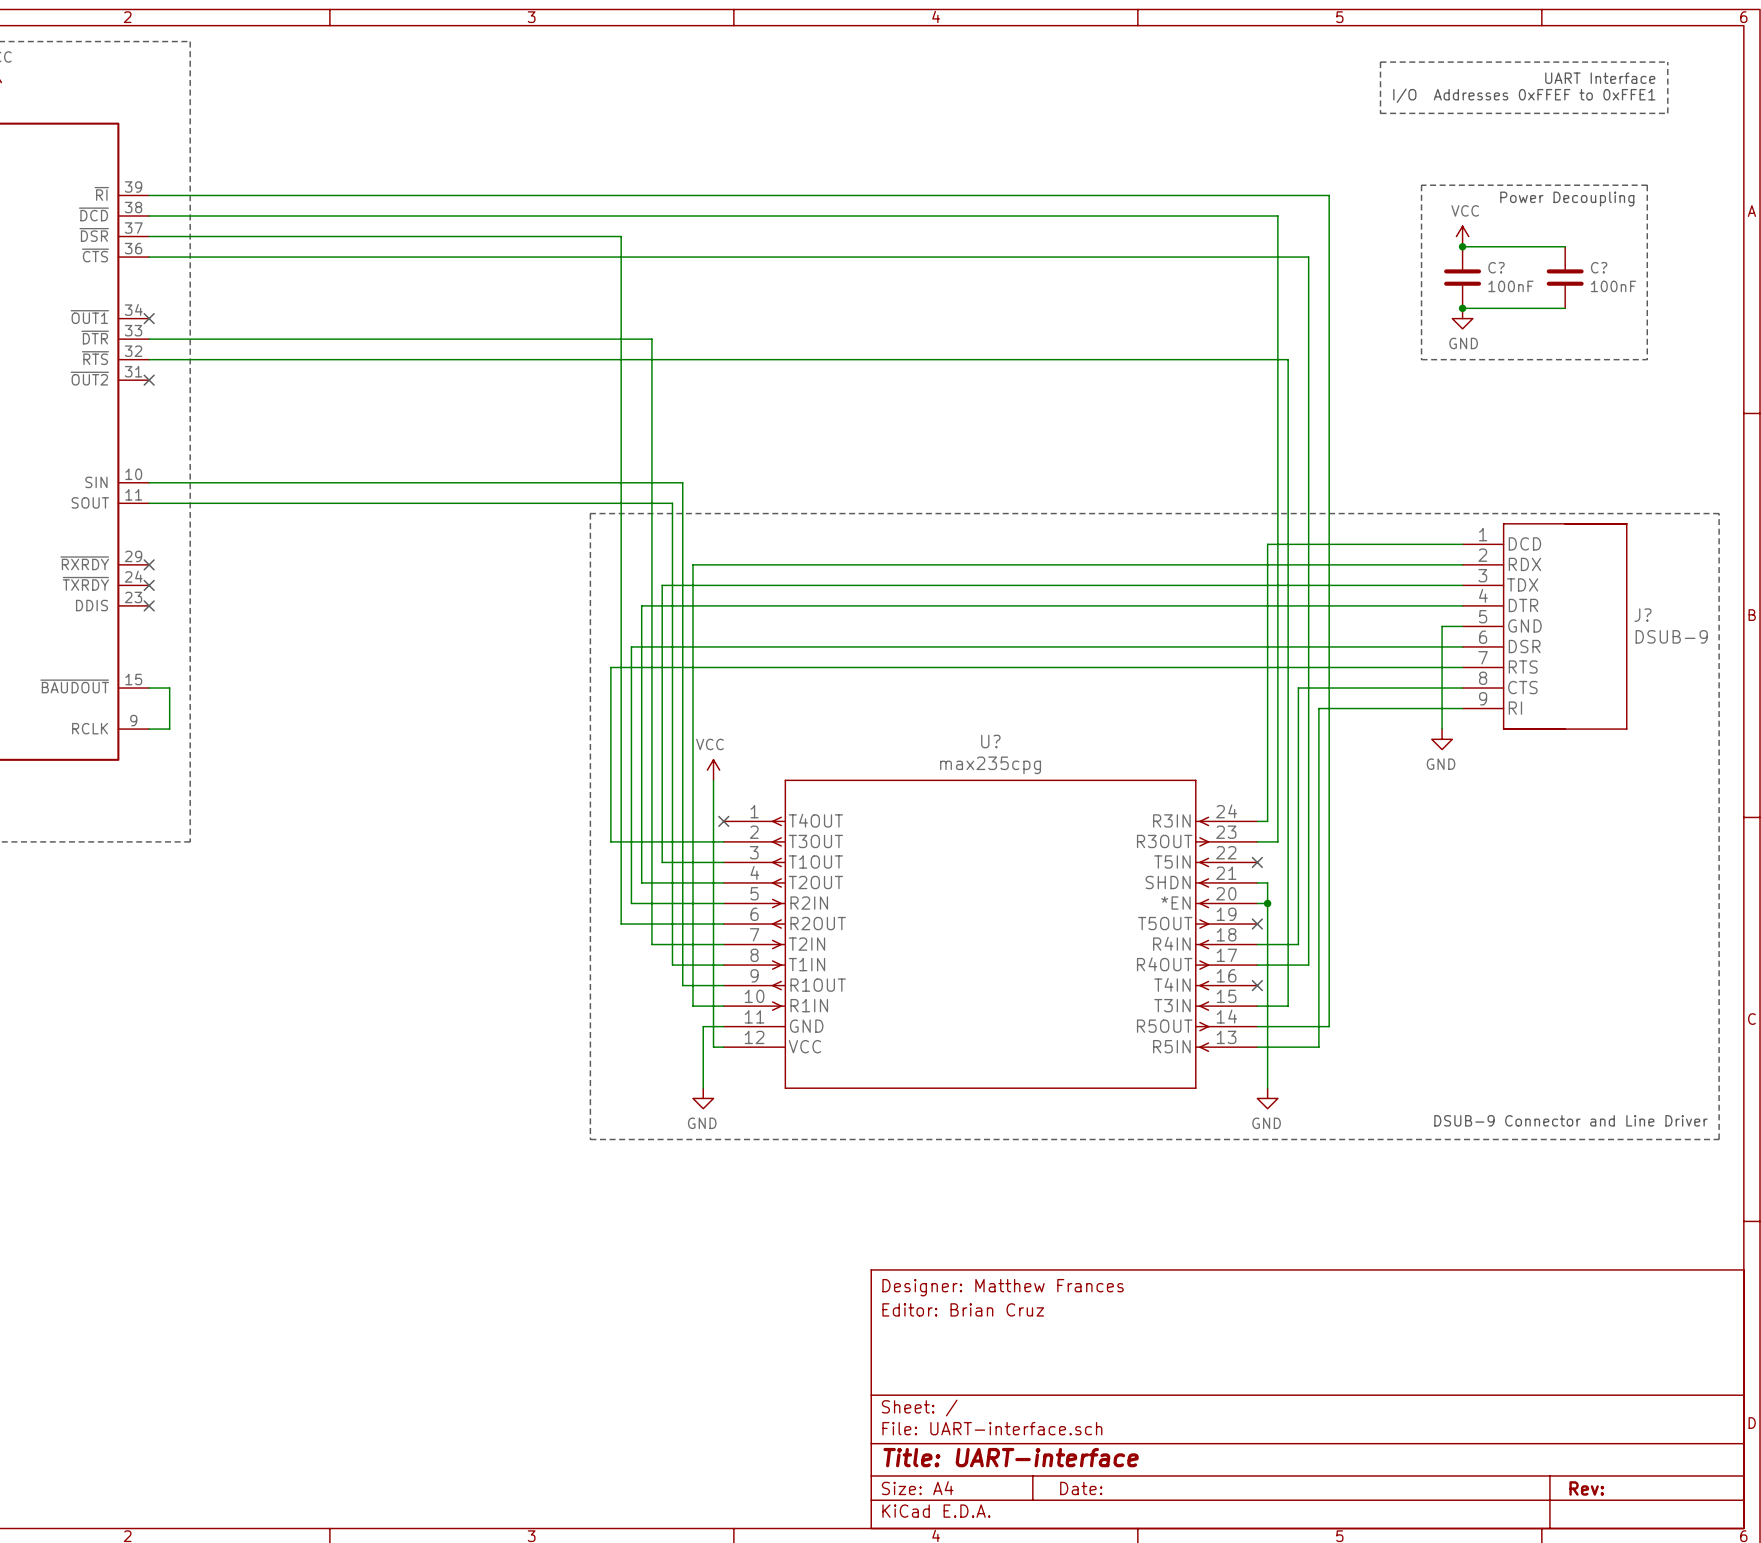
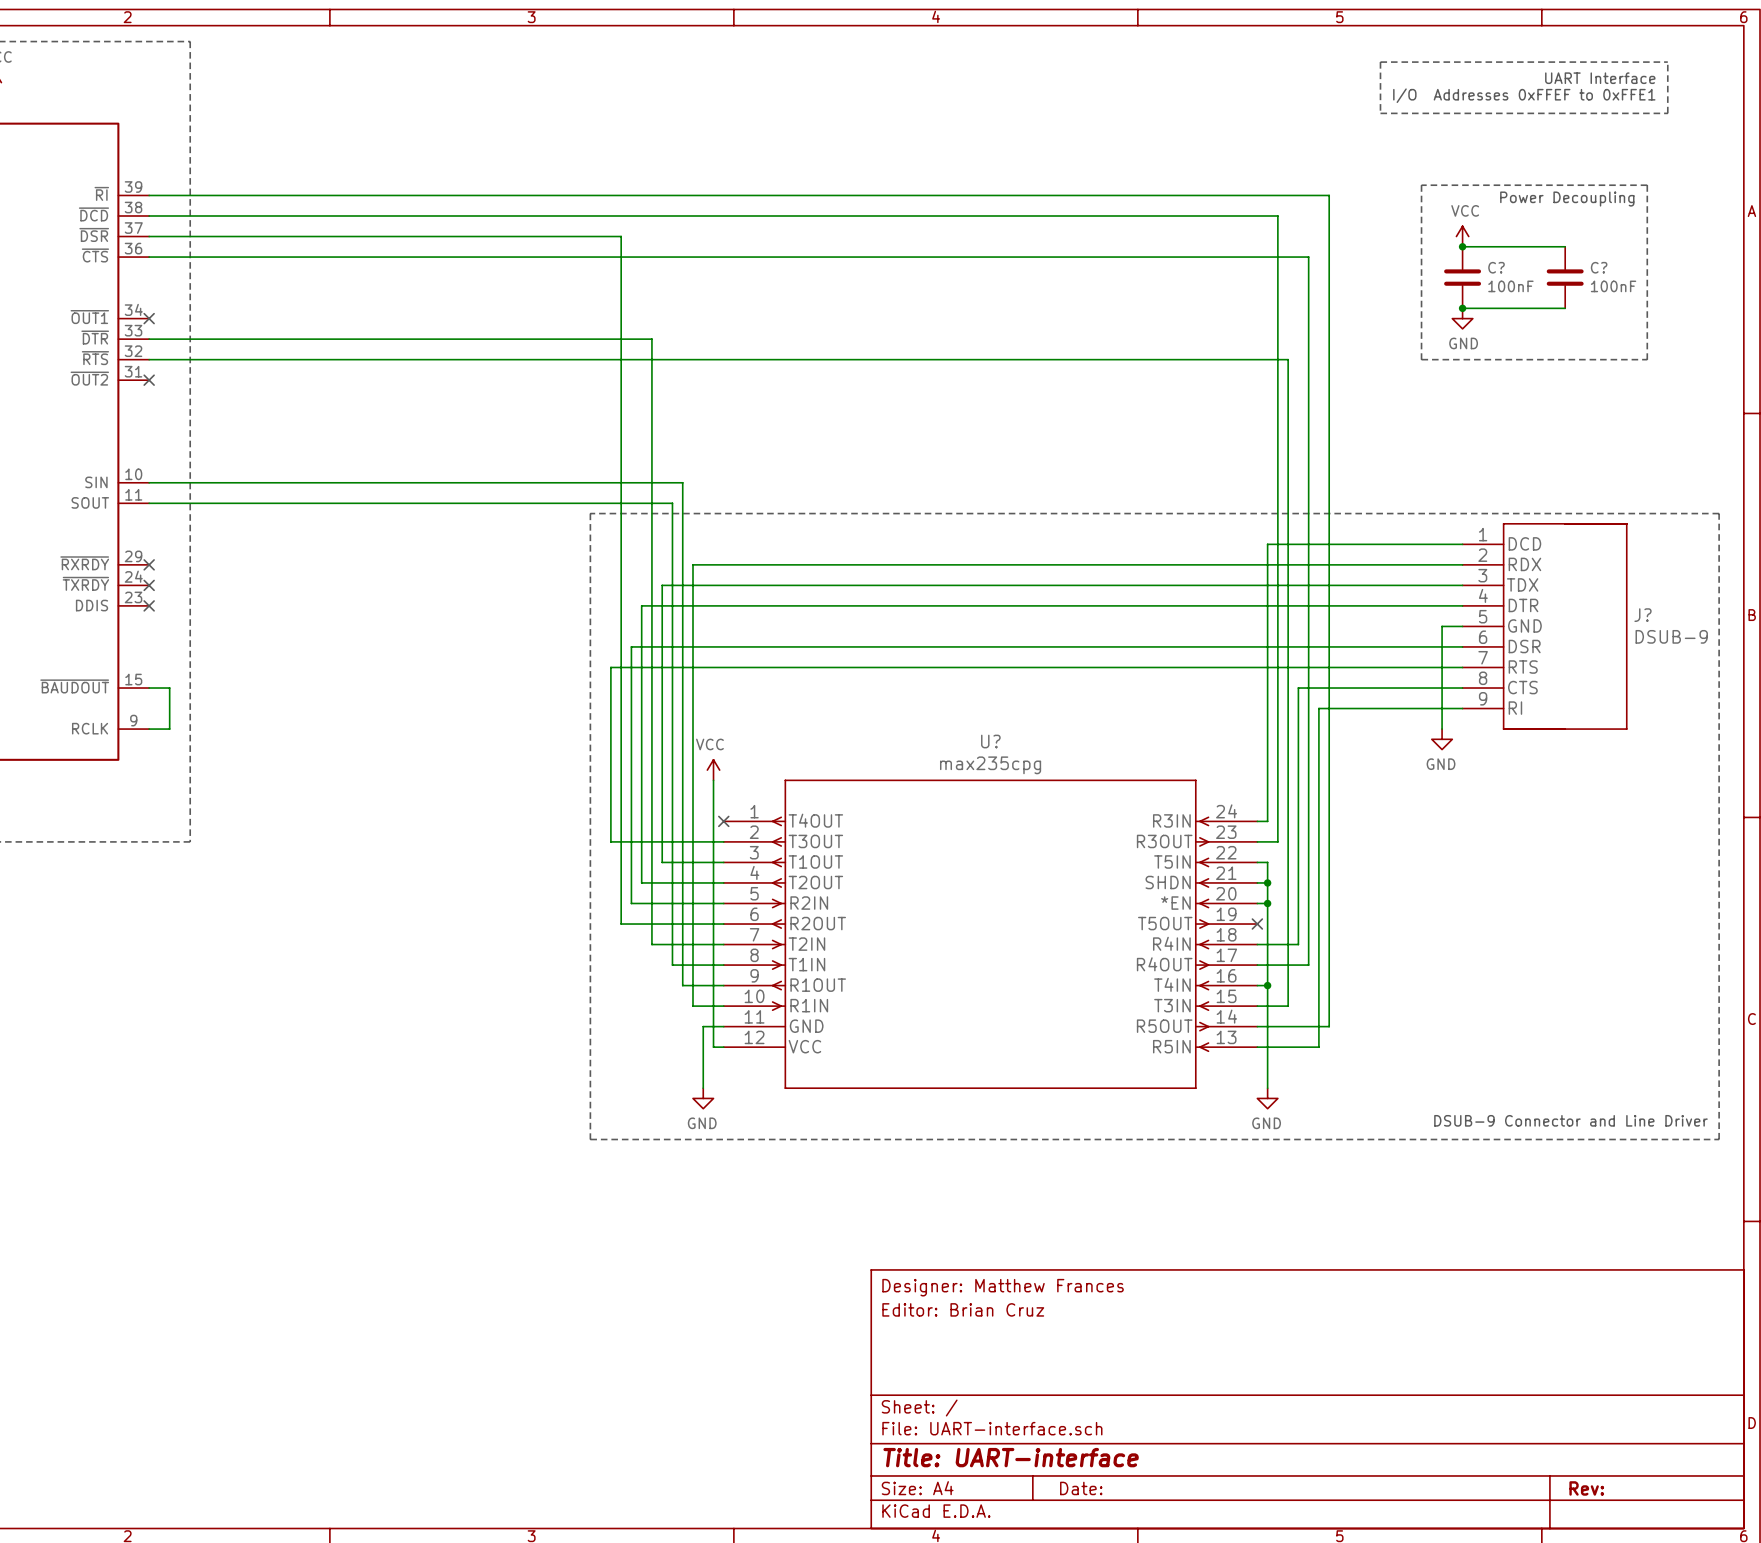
wire: none -> (1257, 862) (1267, 862) (1267, 882)
no-connect mark: (1257, 862) -> none
junction: none -> (1267, 882)
wire: none -> (1257, 985) (1267, 985)
no-connect mark: (1257, 985) -> none
junction: none -> (1267, 985)

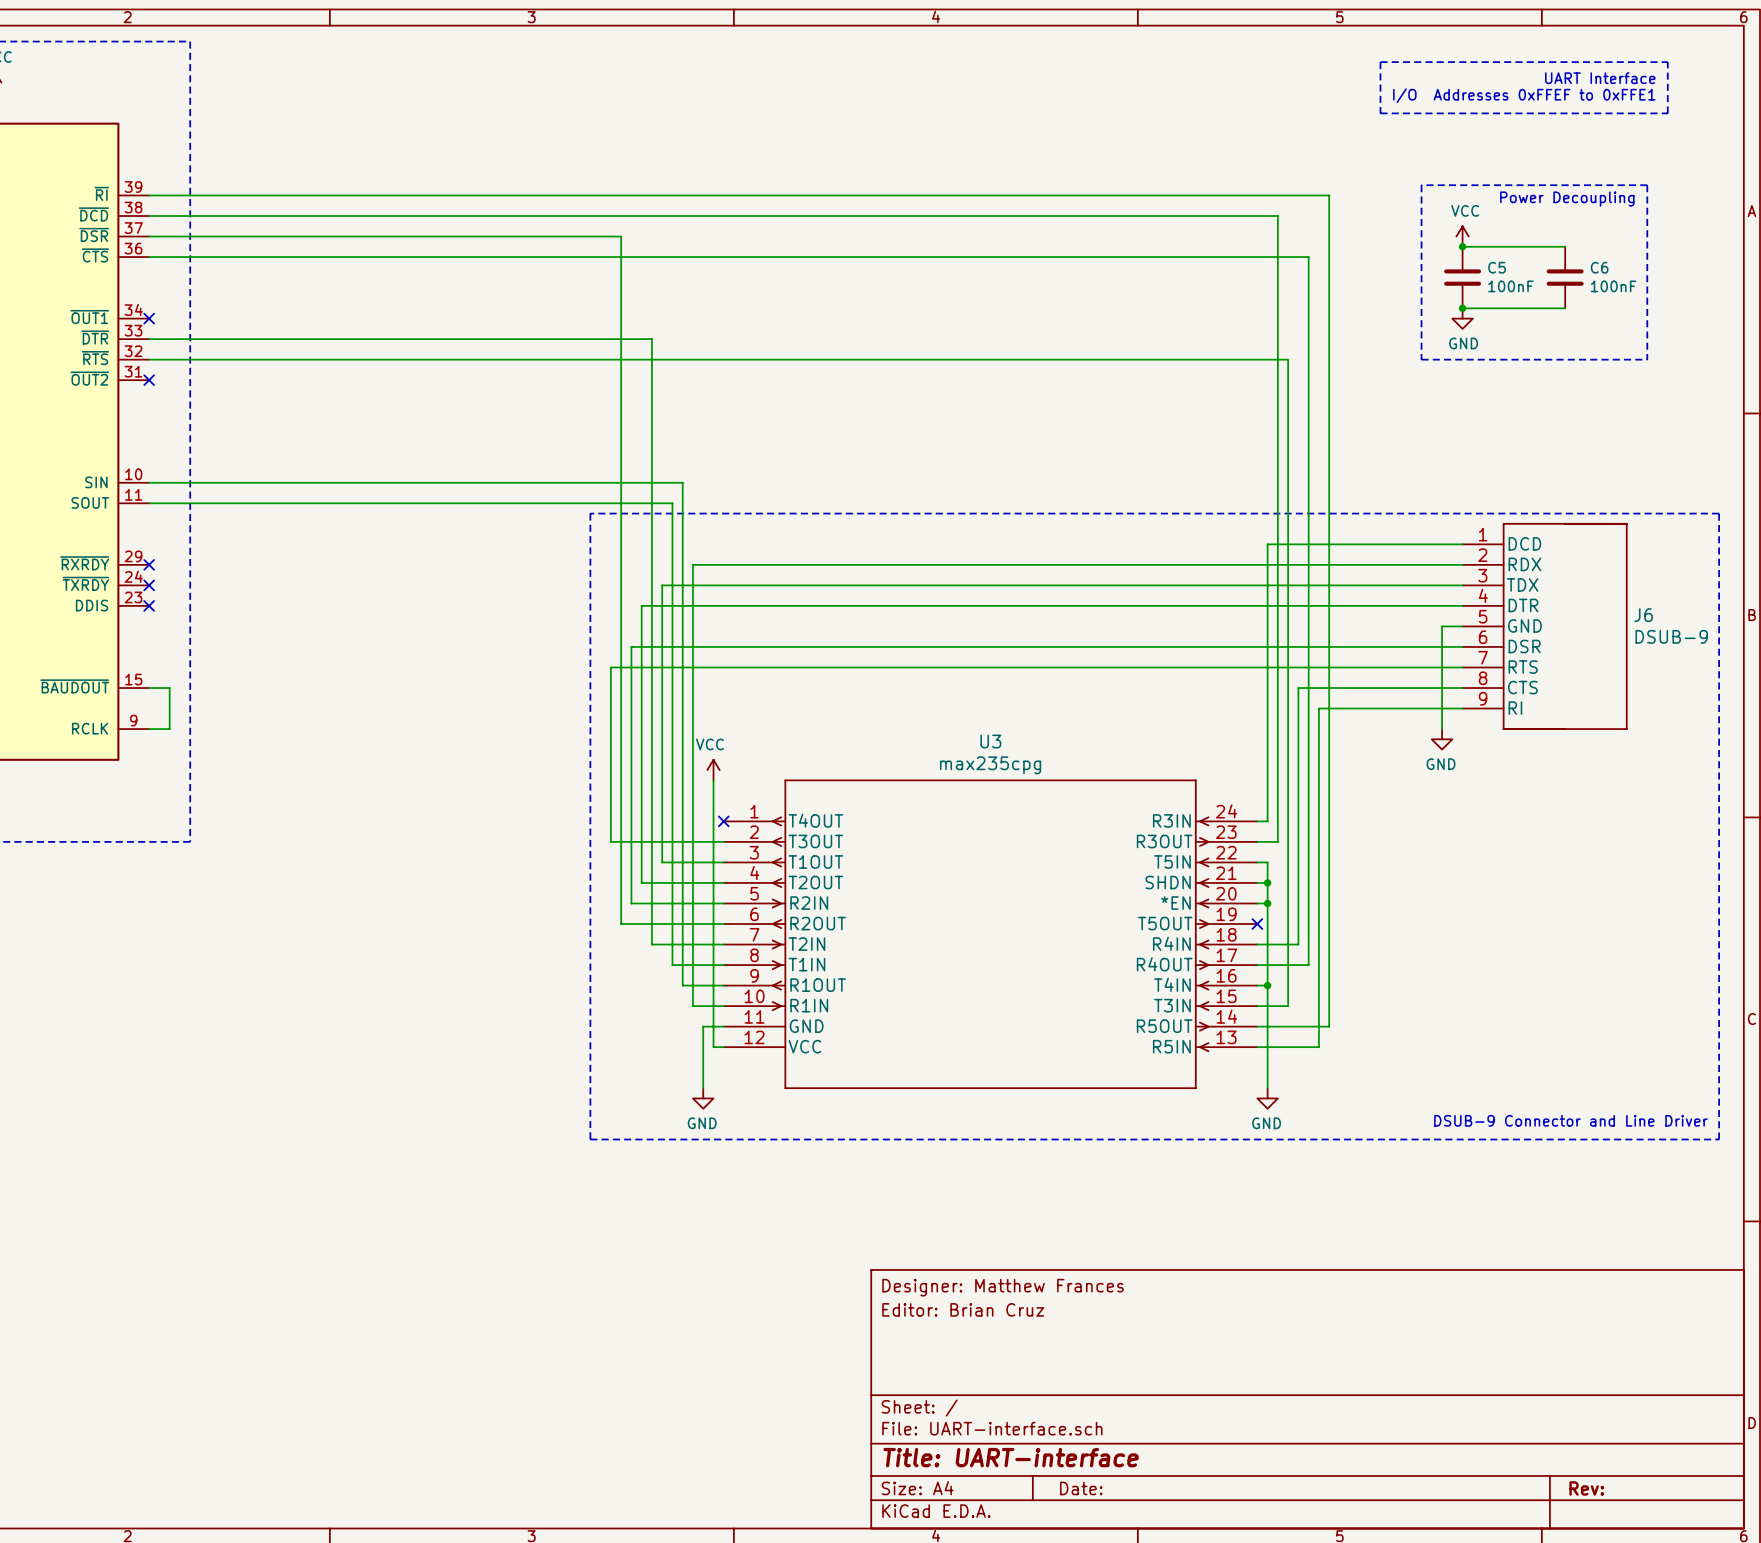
C? name: C? (1496, 267) -> C5 (1497, 267)
C? name: C? (1599, 267) -> C6 (1599, 267)
J? name: J? (1642, 615) -> J6 (1643, 615)
U? name: U? (990, 741) -> U3 (990, 741)

